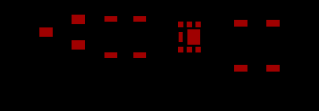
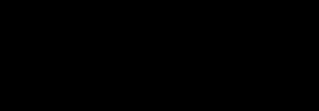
part: (125, 18) -> none
part: (256, 23) -> none
part: (62, 32) -> none
part: (189, 37) -> none
part: (125, 55) -> none
part: (256, 68) -> none

